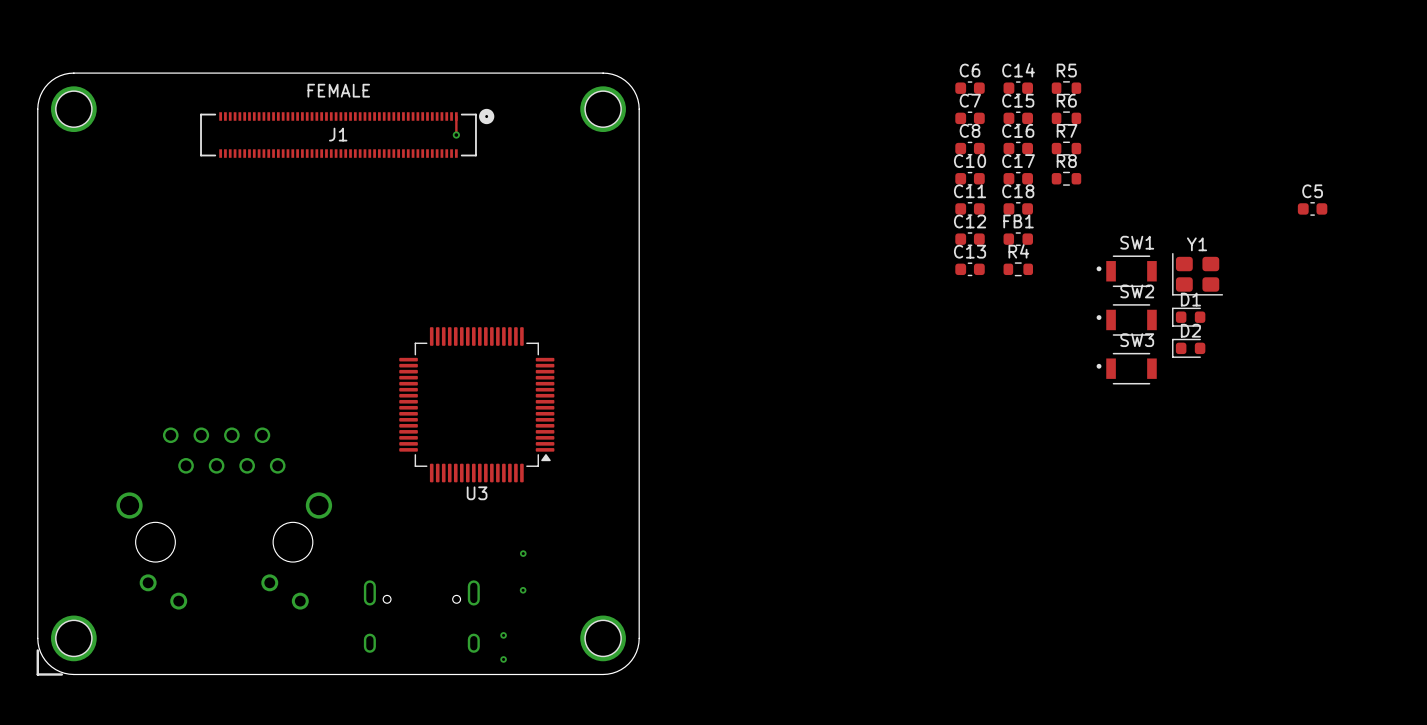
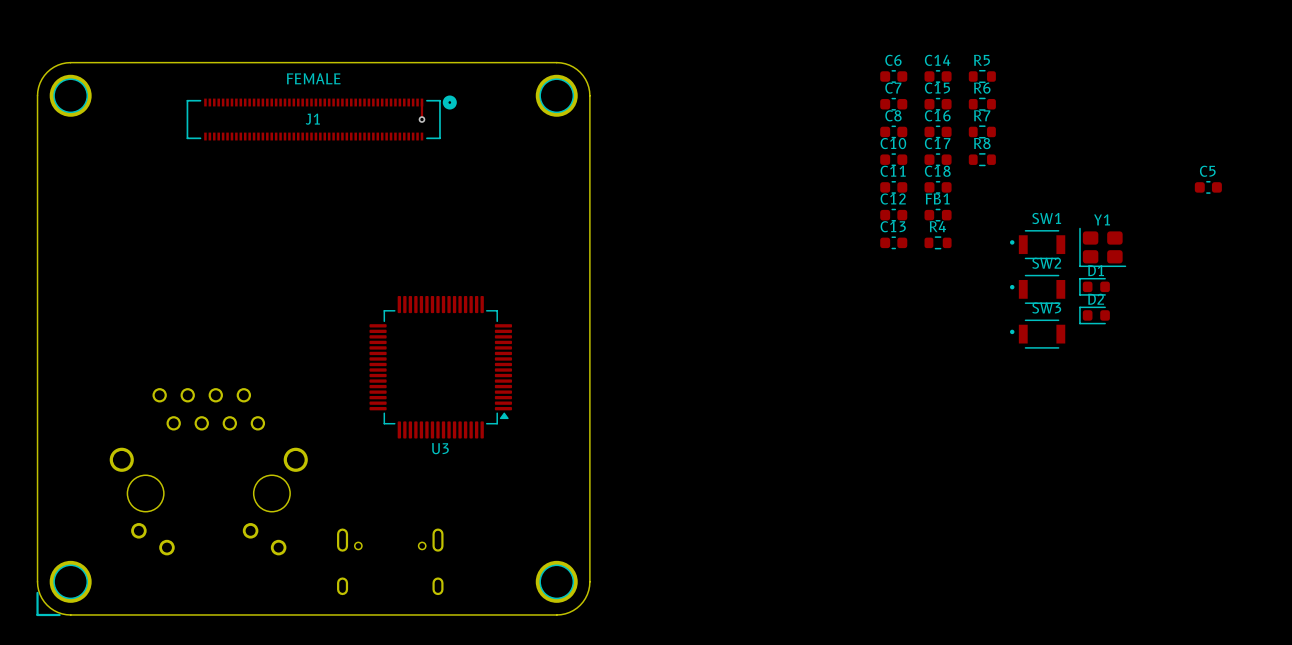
via: (523, 553) -> none
via: (523, 590) -> none
via: (503, 635) -> none
via: (503, 659) -> none

